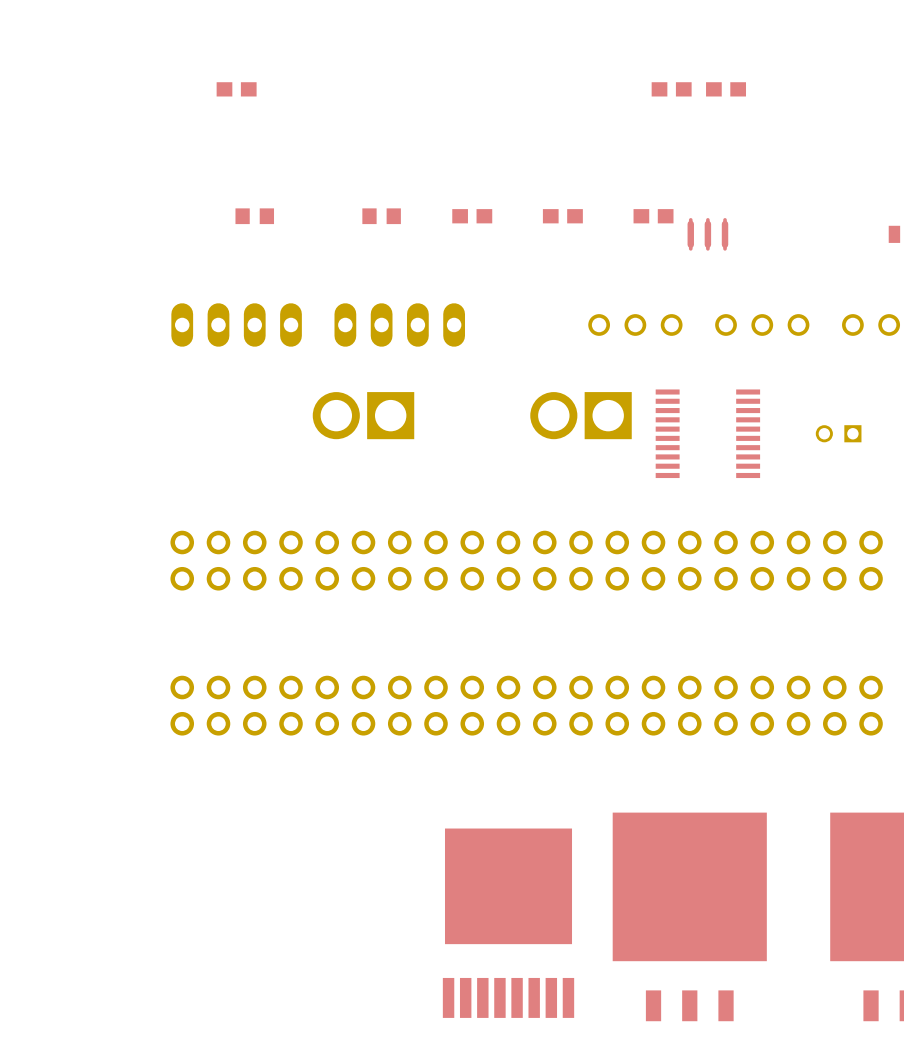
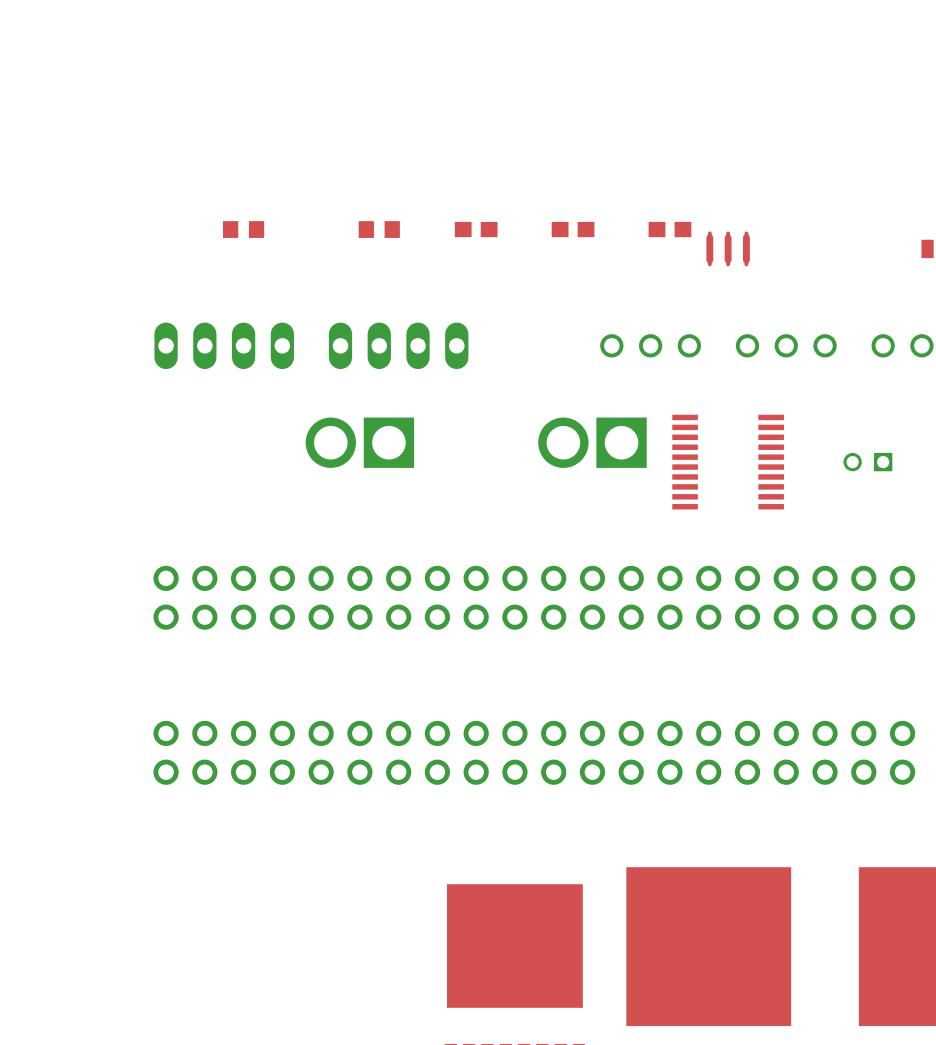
part: (236, 89) -> none
part: (671, 89) -> none
part: (726, 89) -> none

